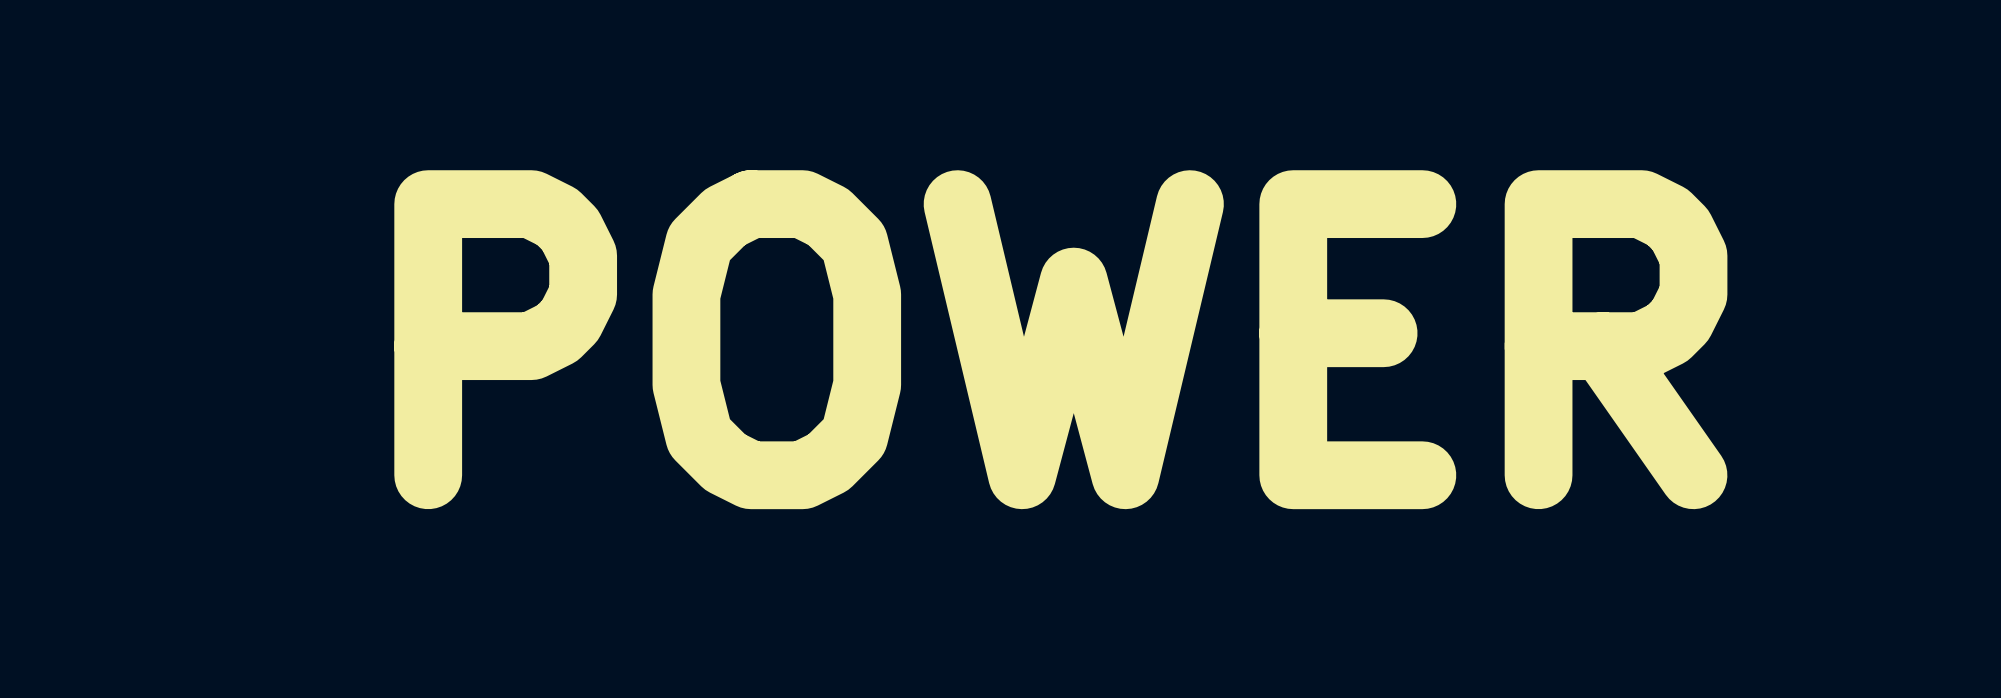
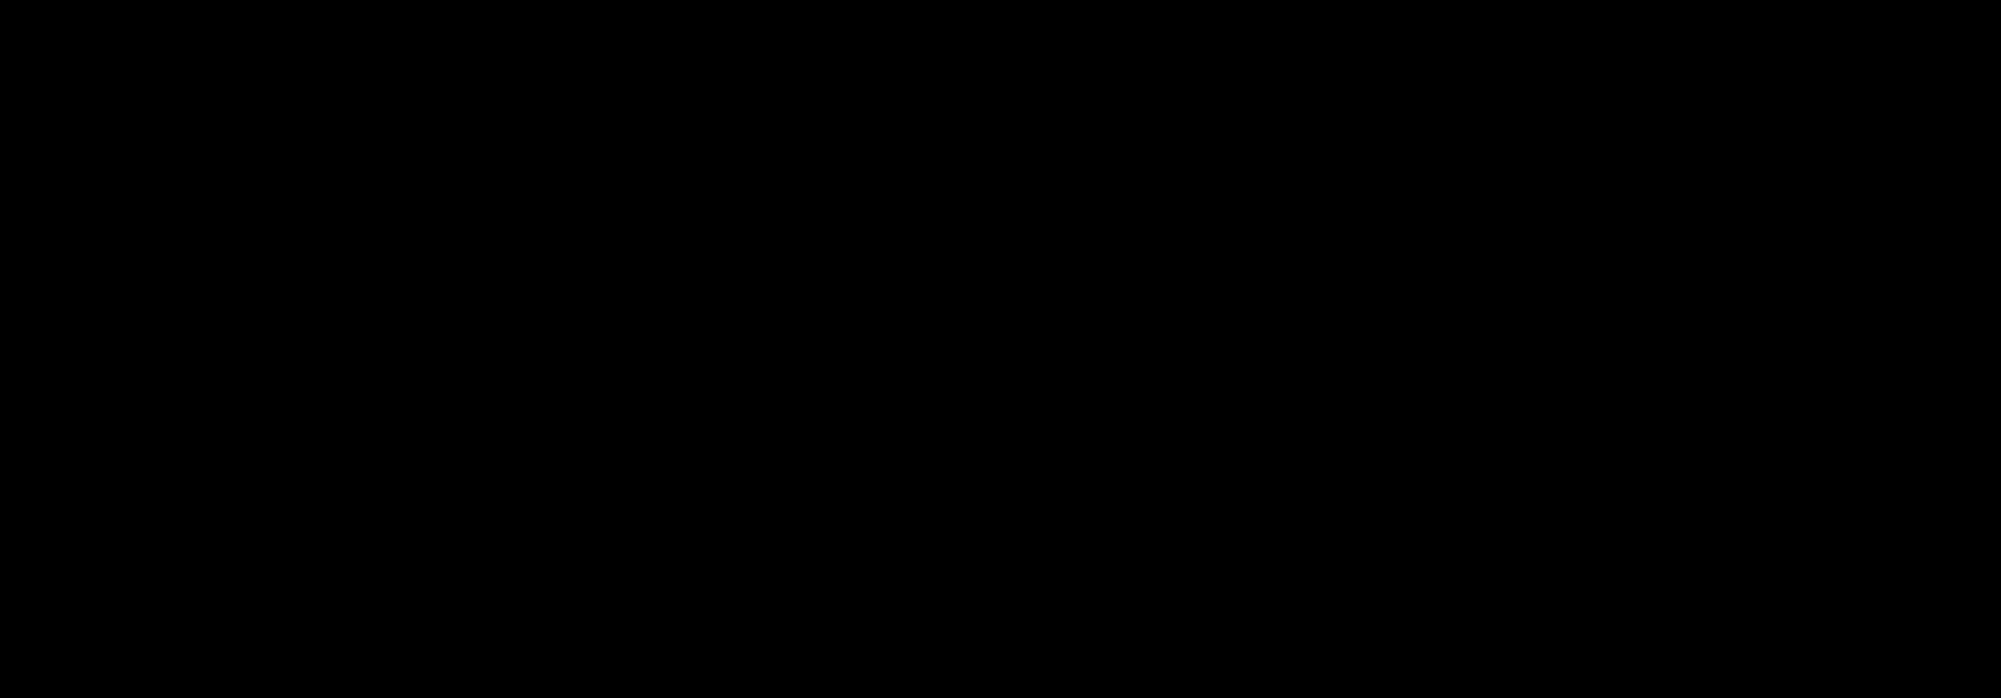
text: POWER (1060, 339) -> none

